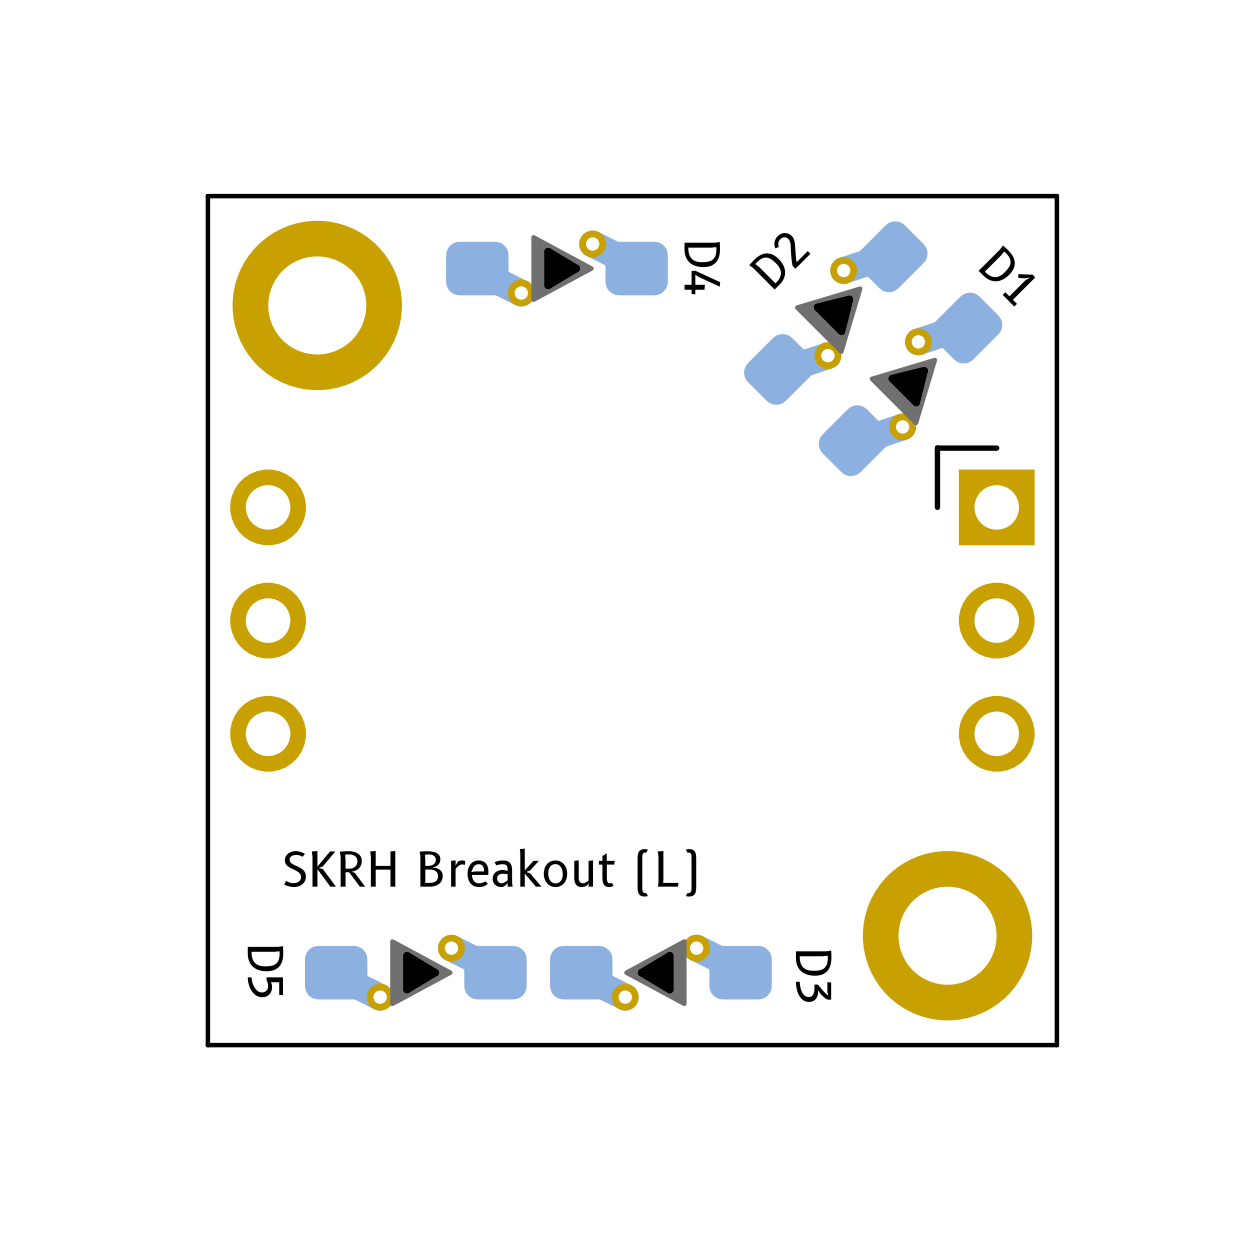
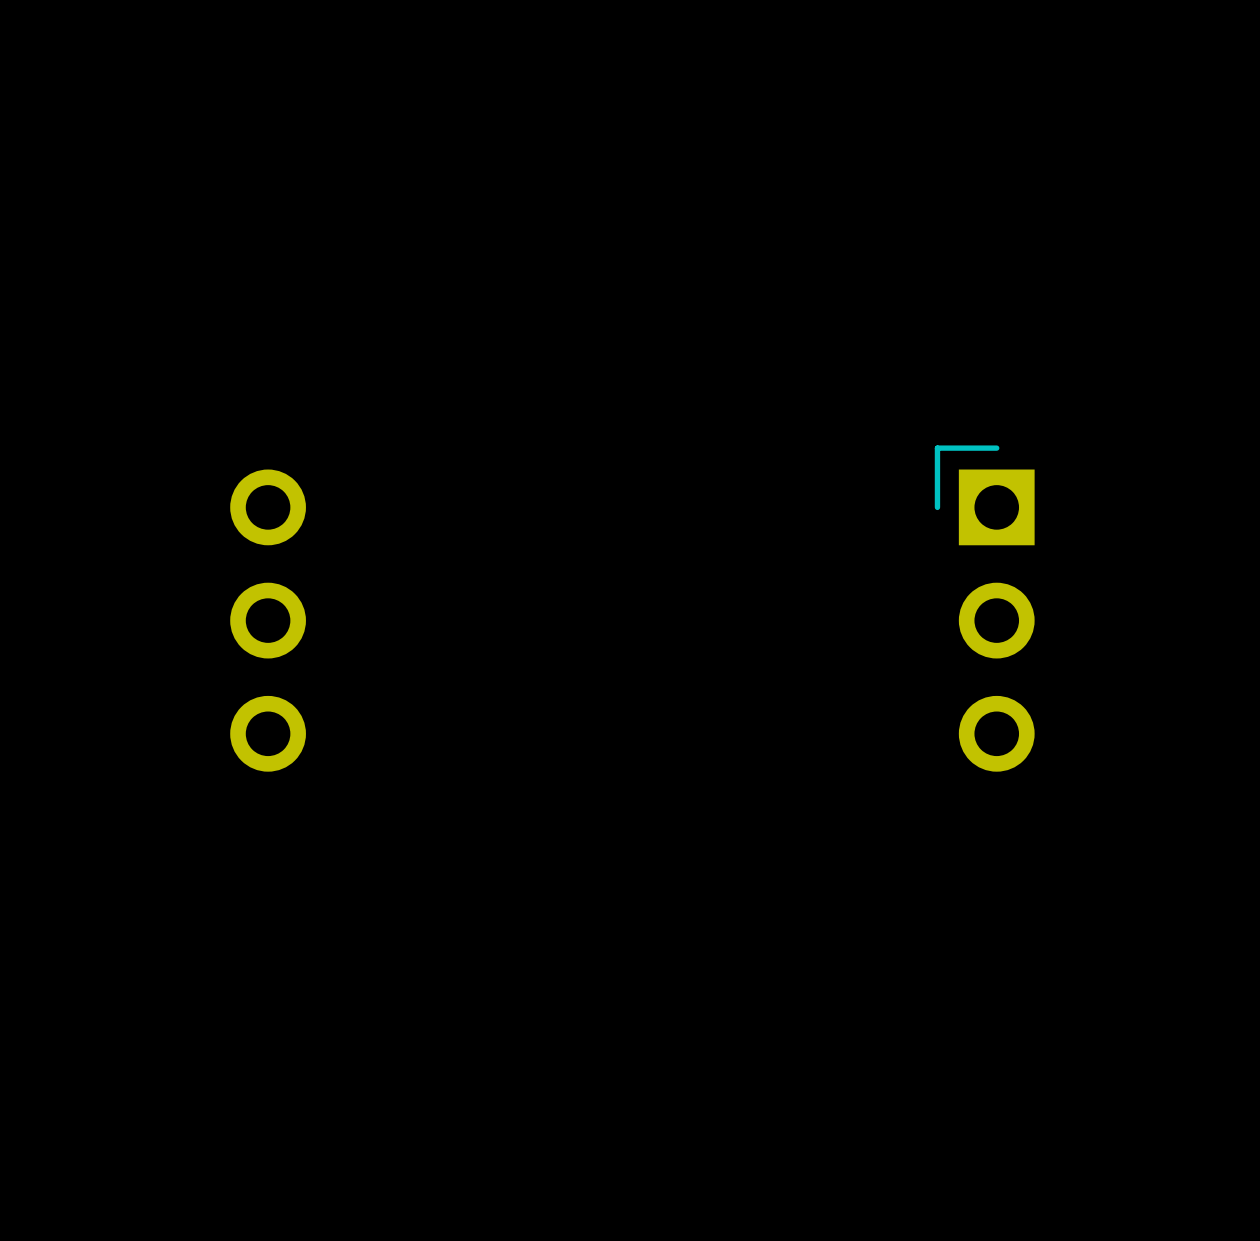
board edge: (1056, 196) (207, 196) (207, 1045) (1056, 1045) (1056, 196) -> none
text: D2 (779, 261) -> none
part: (556, 268) -> none
text: D4 (702, 268) -> none
text: D1 (1006, 275) -> none
part: (317, 305) -> none
part: (835, 313) -> none
part: (910, 384) -> none
text: SKRH Breakout (L) (490, 872) -> none
part: (947, 935) -> none
text: D5 (265, 971) -> none
part: (415, 972) -> none
part: (660, 972) -> none
text: D3 (813, 976) -> none

